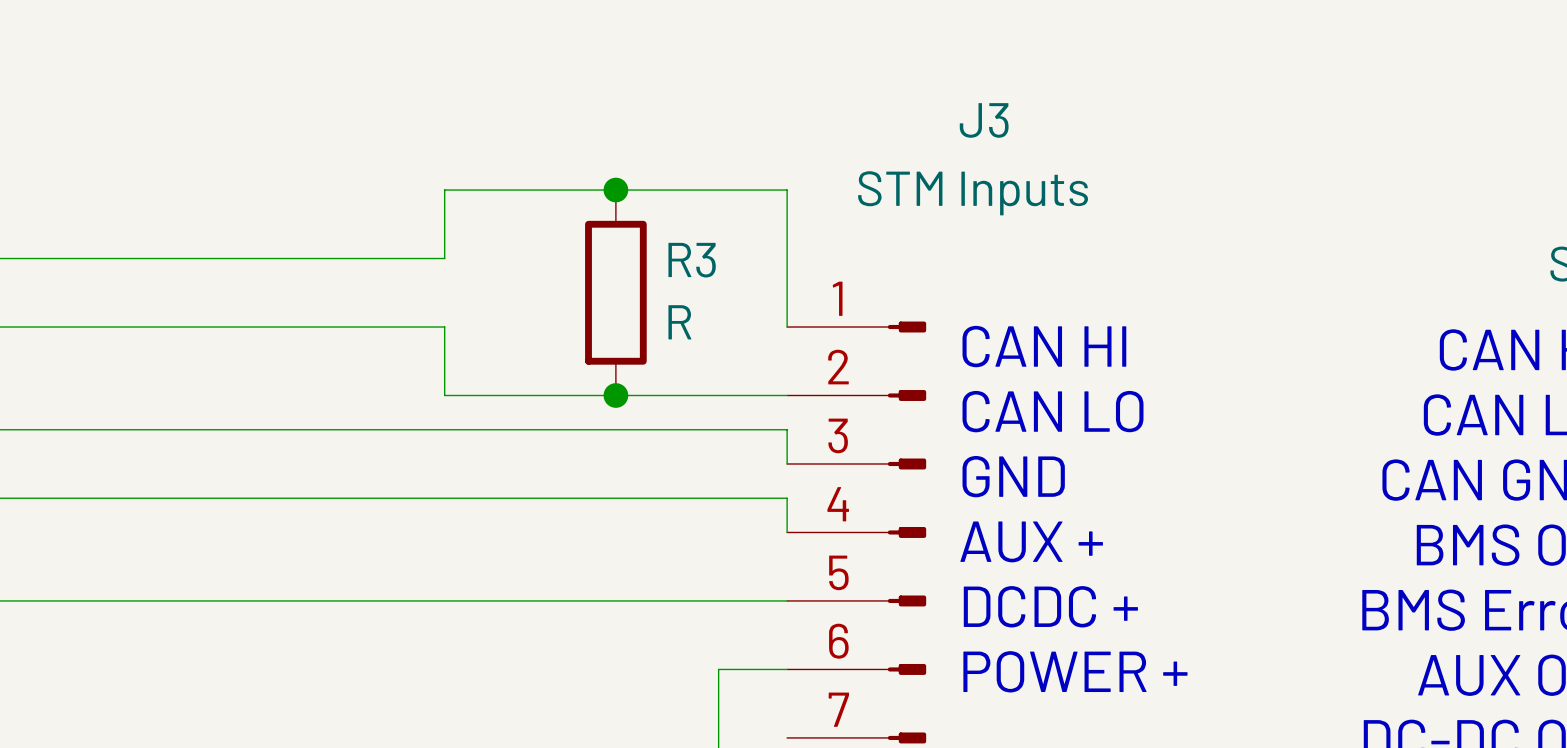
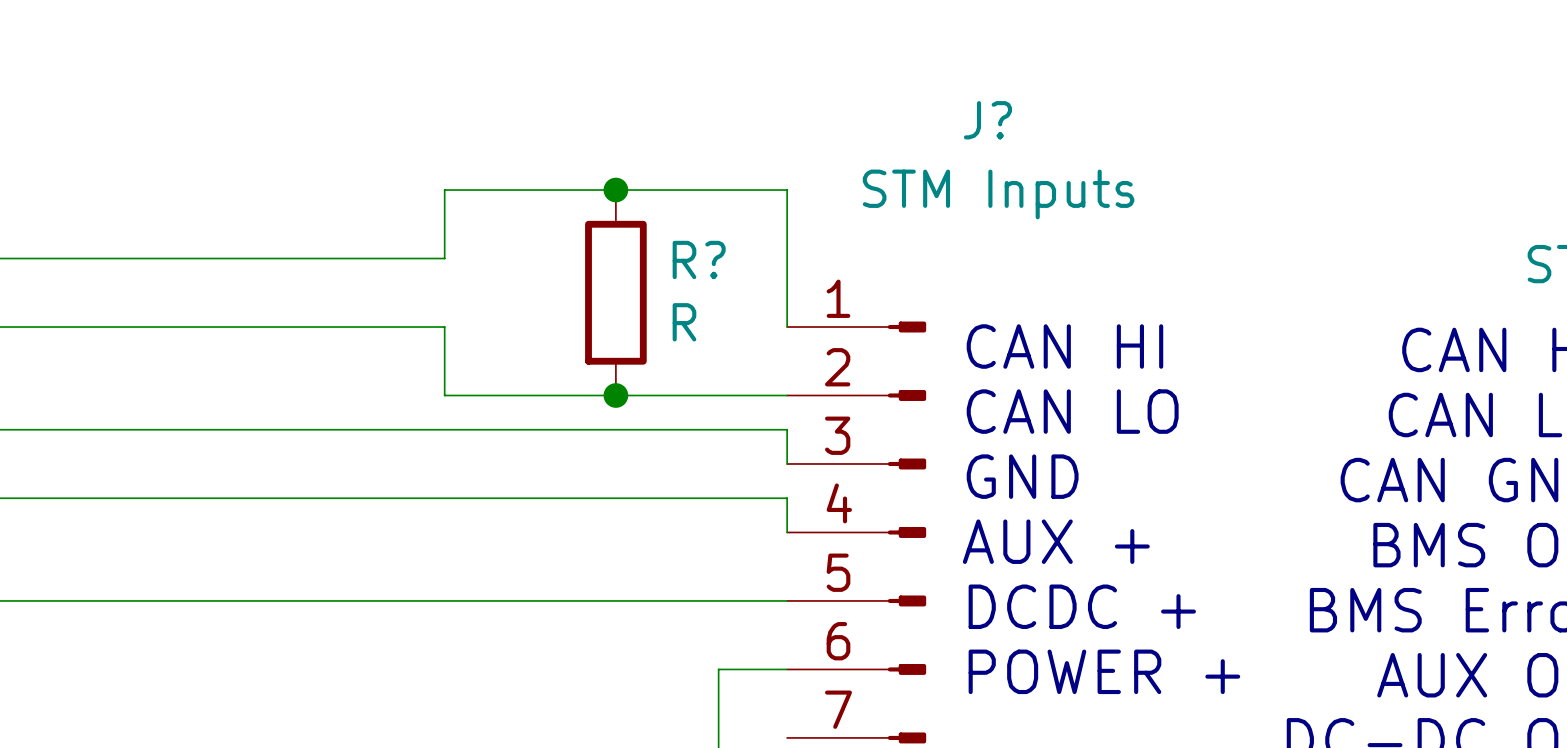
J3 name: J3 (984, 120) -> J? (987, 120)
R3 name: R3 (692, 260) -> R? (699, 259)

